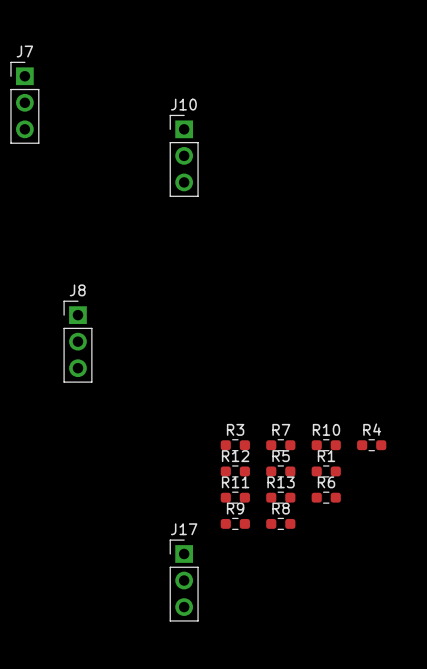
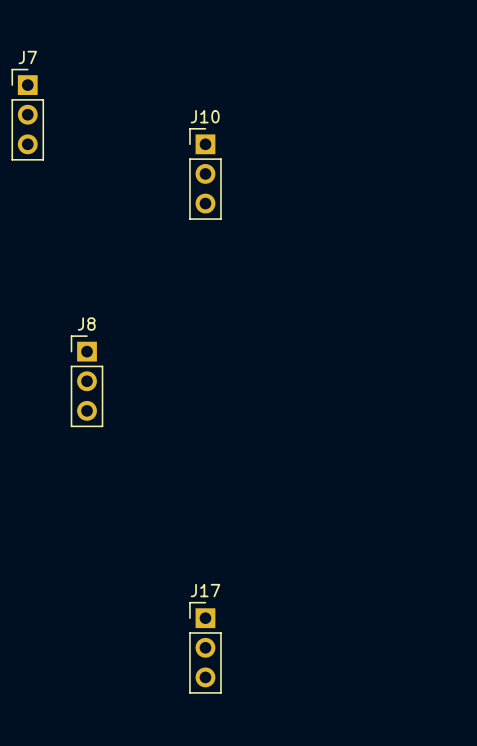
R3: (235, 445) -> none
R7: (280, 445) -> none
R10: (326, 445) -> none
R4: (371, 445) -> none
R12: (235, 471) -> none
R5: (280, 471) -> none
R1: (326, 471) -> none
R11: (235, 497) -> none
R13: (280, 497) -> none
R6: (326, 497) -> none
R9: (235, 523) -> none
R8: (280, 523) -> none

